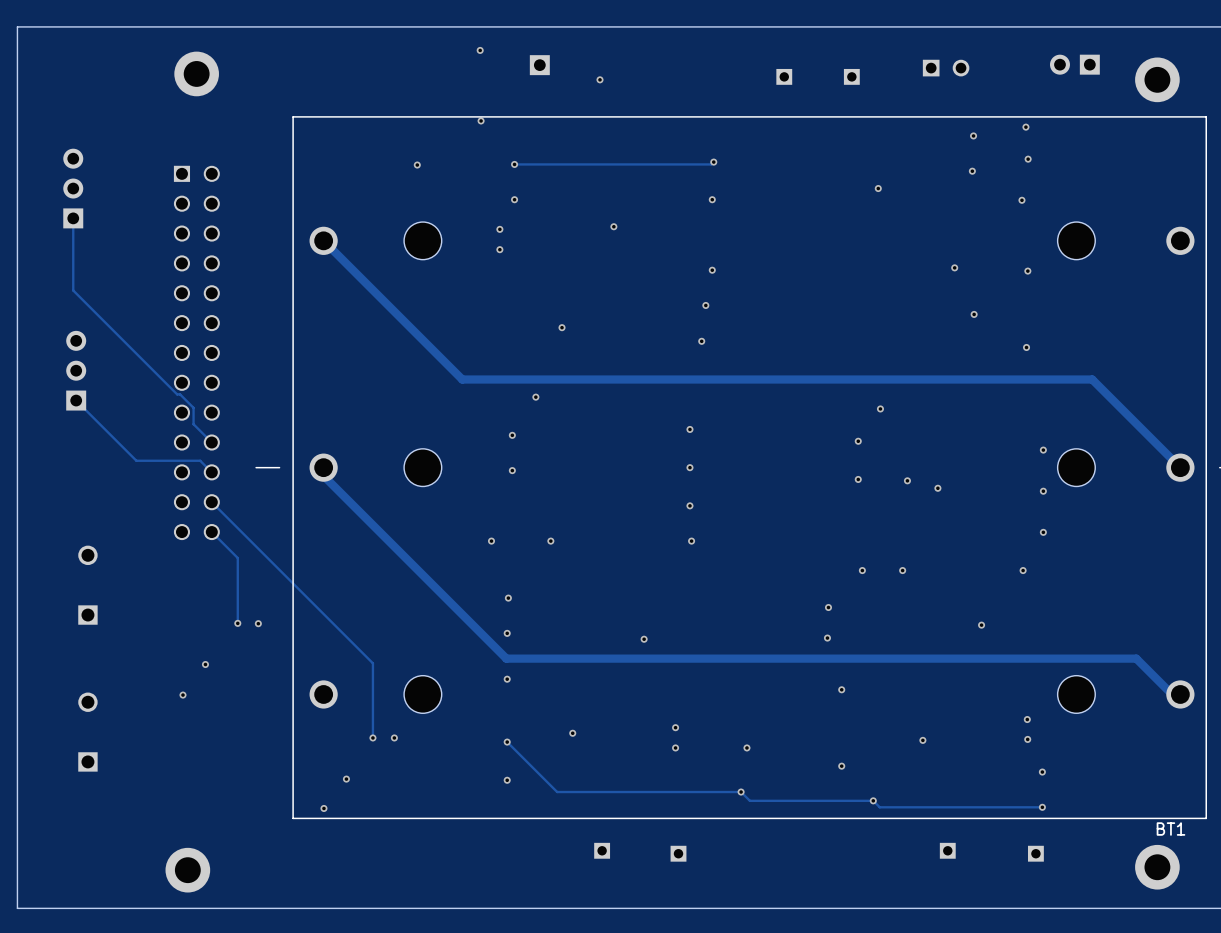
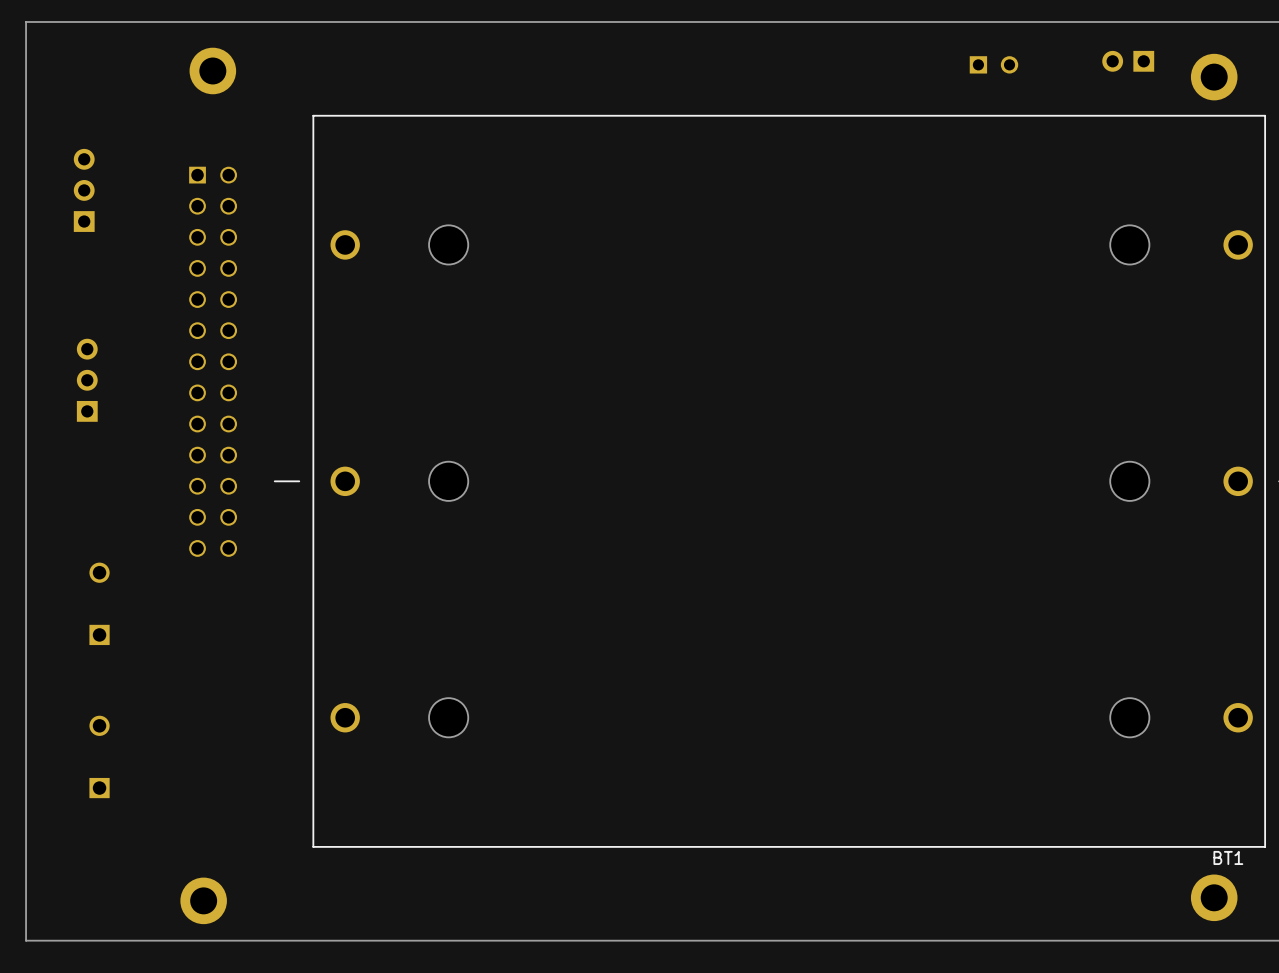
via: (480, 50) -> none
part: (539, 65) -> none
part: (784, 76) -> none
part: (851, 76) -> none
via: (599, 79) -> none
via: (481, 120) -> none
via: (1025, 127) -> none
via: (973, 135) -> none
via: (1028, 159) -> none
track: (713, 162) (711, 164) (514, 164) -> none
via: (713, 162) -> none
via: (514, 164) -> none
via: (417, 165) -> none
via: (972, 171) -> none
via: (878, 188) -> none
via: (514, 199) -> none
via: (712, 199) -> none
via: (1021, 200) -> none
track: (73, 218) (73, 290) (177, 394) (180, 394) (193, 407) (193, 424) (211, 442) -> none
via: (613, 226) -> none
via: (499, 229) -> none
track: (323, 240) (462, 379) (1092, 379) (1180, 467) -> none
via: (499, 249) -> none
via: (954, 267) -> none
via: (712, 270) -> none
via: (1027, 271) -> none
via: (705, 305) -> none
via: (974, 314) -> none
via: (562, 327) -> none
via: (701, 341) -> none
via: (1026, 347) -> none
via: (535, 397) -> none
track: (76, 400) (136, 460) (200, 460) (211, 472) -> none
via: (880, 408) -> none
via: (689, 429) -> none
via: (512, 435) -> none
via: (858, 441) -> none
via: (1043, 450) -> none
via: (689, 467) -> none
via: (512, 470) -> none
track: (323, 475) (506, 658) (1136, 658) (1180, 702) -> none
via: (858, 479) -> none
via: (907, 480) -> none
via: (937, 488) -> none
via: (1043, 491) -> none
track: (211, 502) (372, 663) (372, 737) -> none
via: (689, 505) -> none
track: (211, 532) (237, 558) (237, 623) -> none
via: (1043, 532) -> none
via: (491, 541) -> none
via: (550, 541) -> none
via: (691, 541) -> none
via: (862, 570) -> none
via: (902, 570) -> none
via: (1023, 570) -> none
via: (508, 598) -> none
via: (828, 607) -> none
via: (237, 623) -> none
via: (258, 623) -> none
via: (981, 625) -> none
via: (507, 633) -> none
via: (827, 638) -> none
via: (644, 639) -> none
via: (205, 664) -> none
via: (507, 679) -> none
via: (841, 689) -> none
via: (182, 695) -> none
via: (1027, 719) -> none
via: (675, 727) -> none
via: (572, 733) -> none
via: (372, 737) -> none
via: (394, 737) -> none
via: (1027, 739) -> none
via: (922, 740) -> none
track: (507, 742) (557, 792) (741, 792) (749, 800) (873, 800) (879, 807) (1042, 807) -> none
via: (507, 742) -> none
via: (675, 747) -> none
via: (746, 747) -> none
via: (841, 766) -> none
via: (1042, 772) -> none
via: (346, 779) -> none
via: (507, 780) -> none
via: (741, 792) -> none
via: (873, 800) -> none
via: (1042, 807) -> none
via: (323, 808) -> none
part: (602, 850) -> none
part: (947, 850) -> none
part: (678, 853) -> none
part: (1035, 853) -> none

